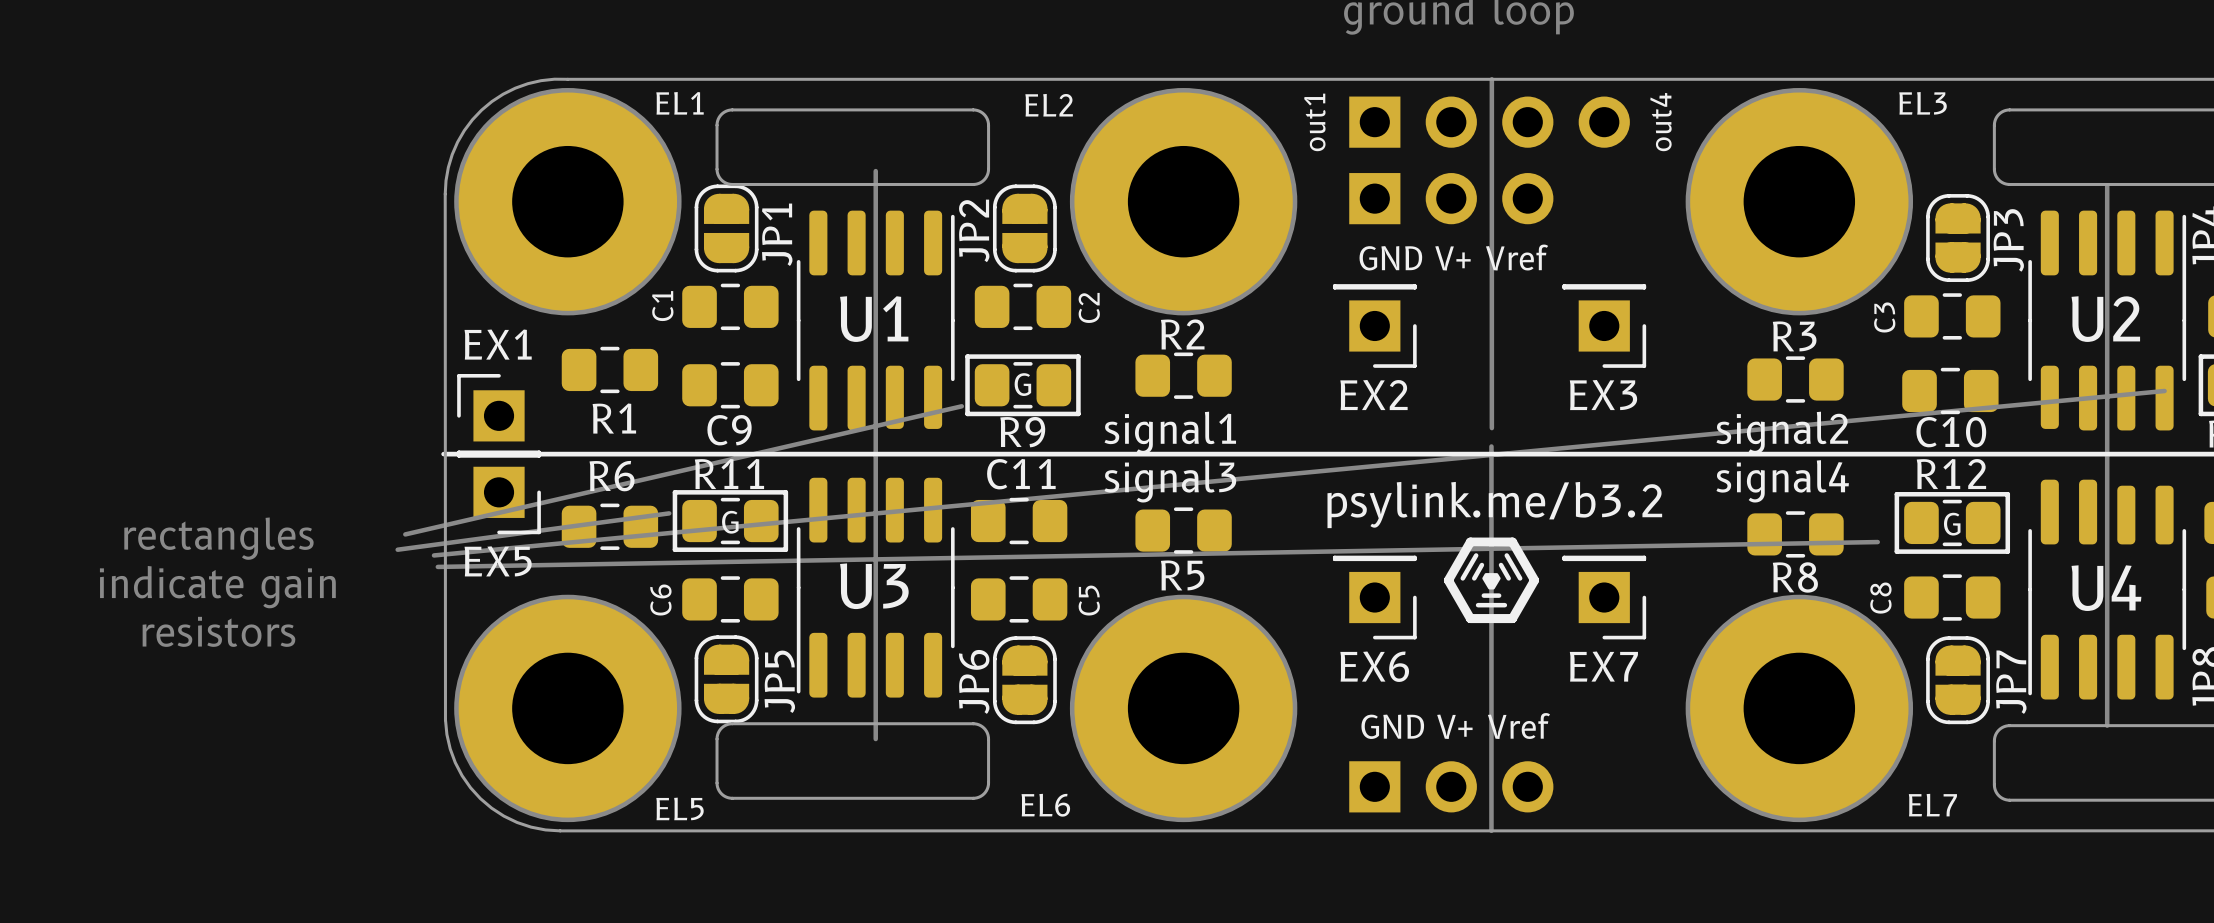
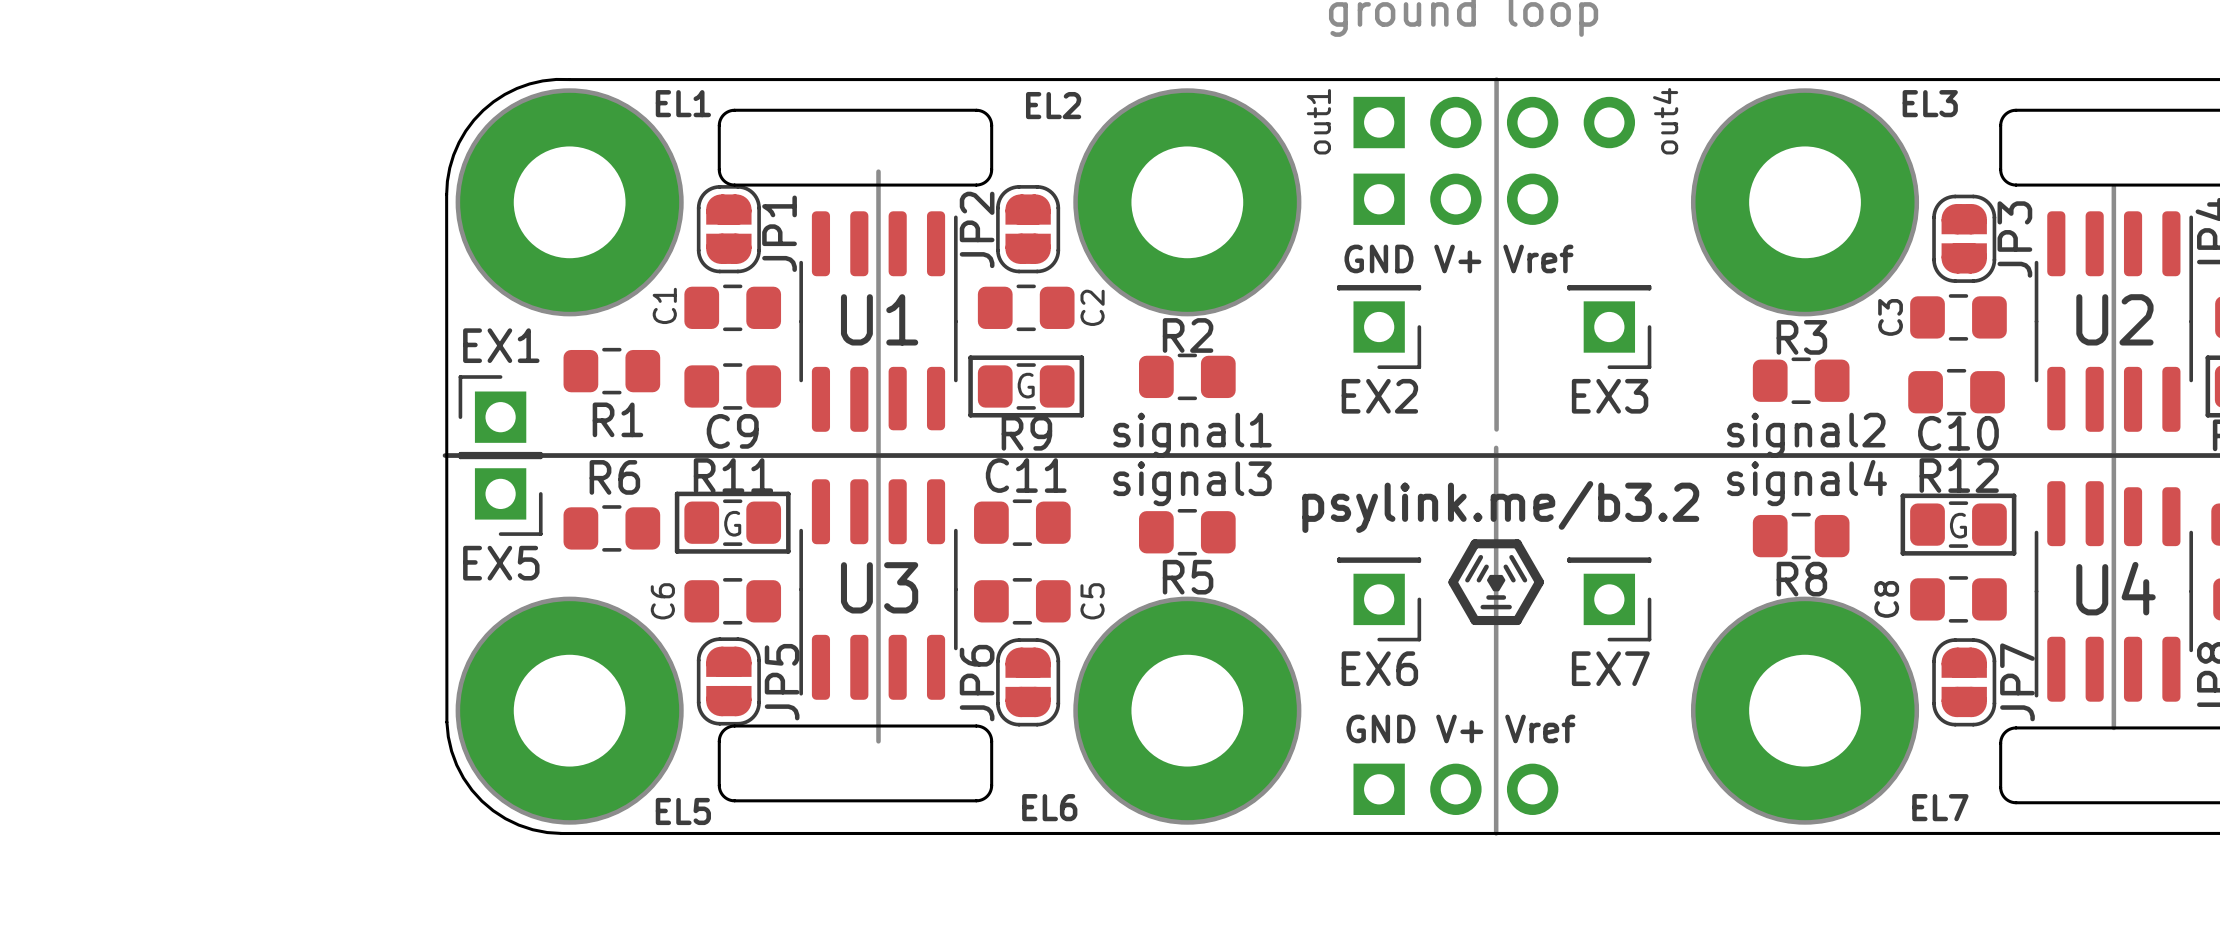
line: (2164, 391) (434, 555) -> none
line: (961, 406) (405, 534) -> none
line: (669, 513) (397, 549) -> none
text: rectangles (218, 538) -> none
line: (1877, 542) (437, 566) -> none
text: indicate gain (217, 587) -> none
text: resistors (218, 631) -> none

